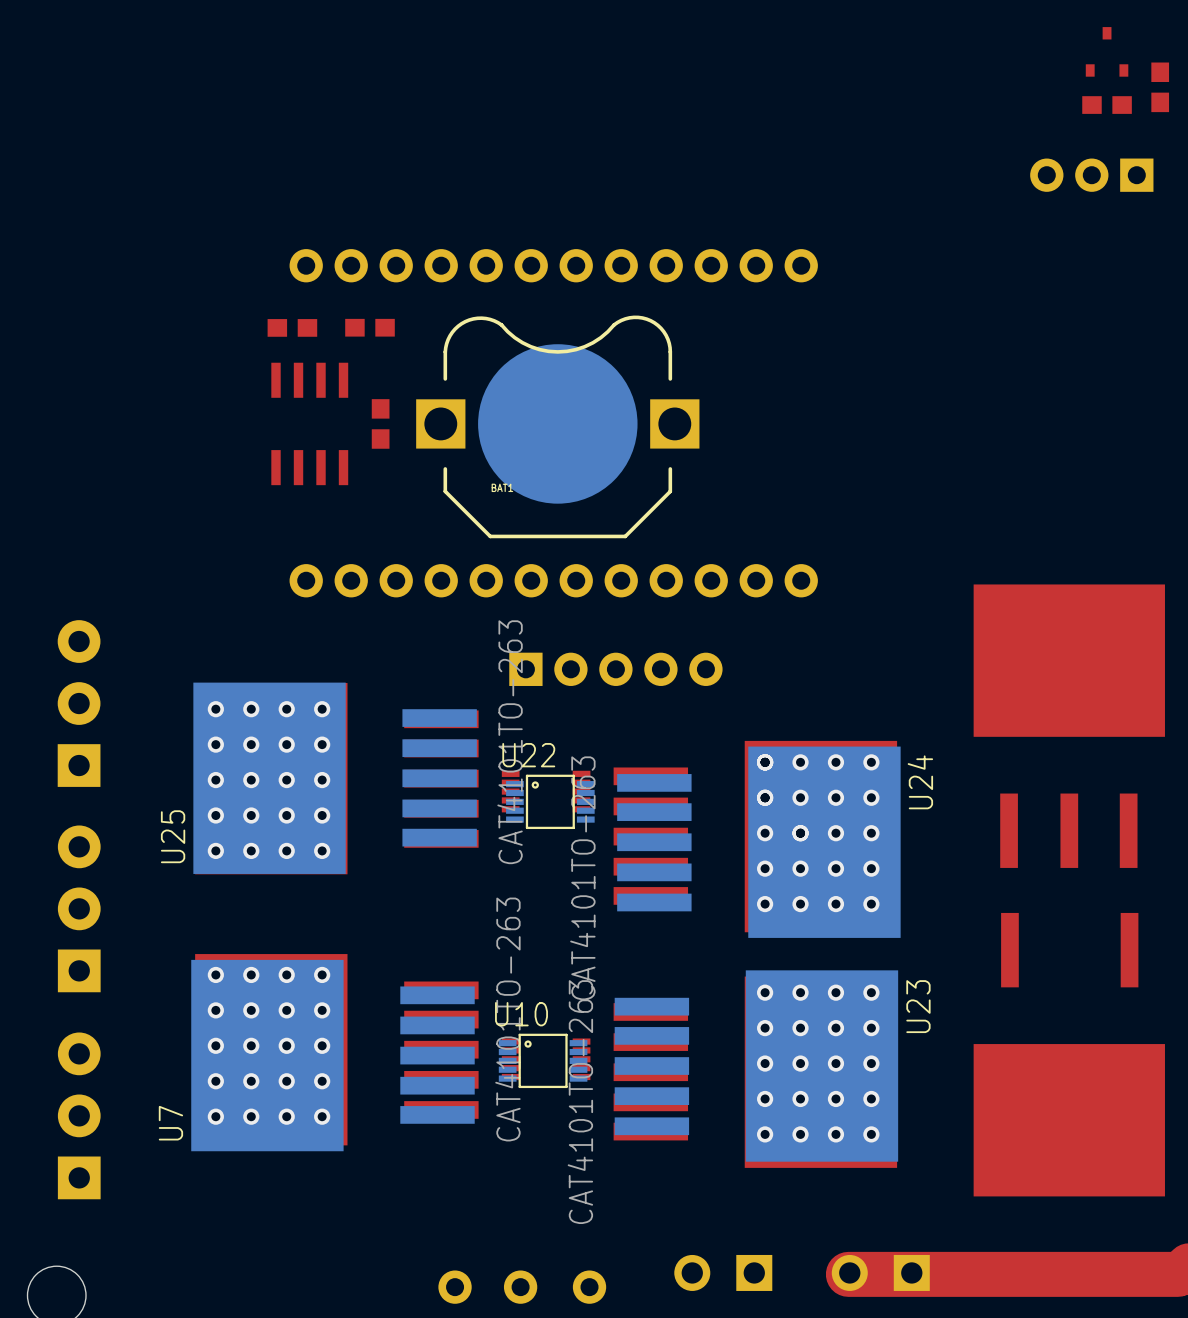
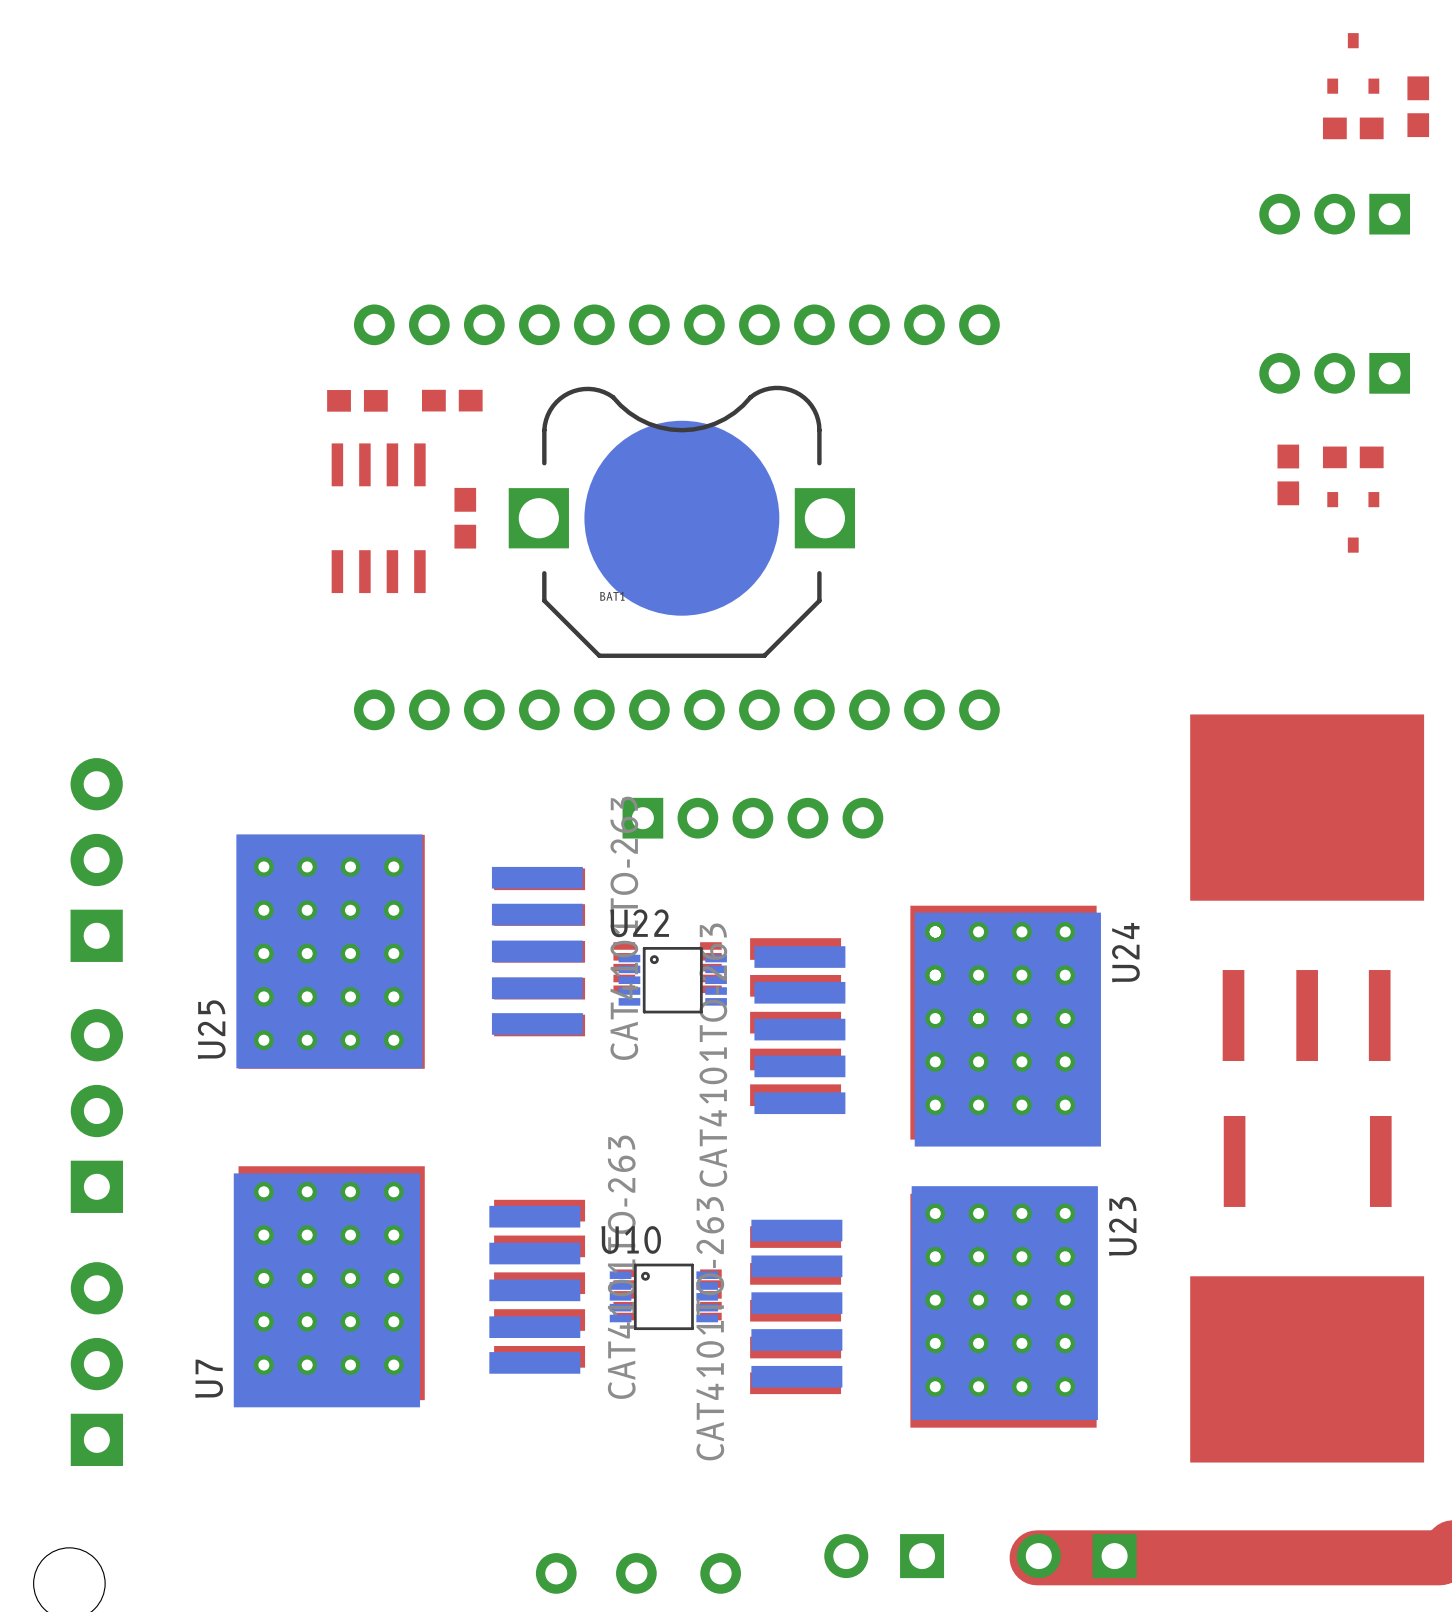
part: none -> (1334, 373)
part: none -> (1353, 457)
part: none -> (1288, 474)
part: none -> (1353, 522)

